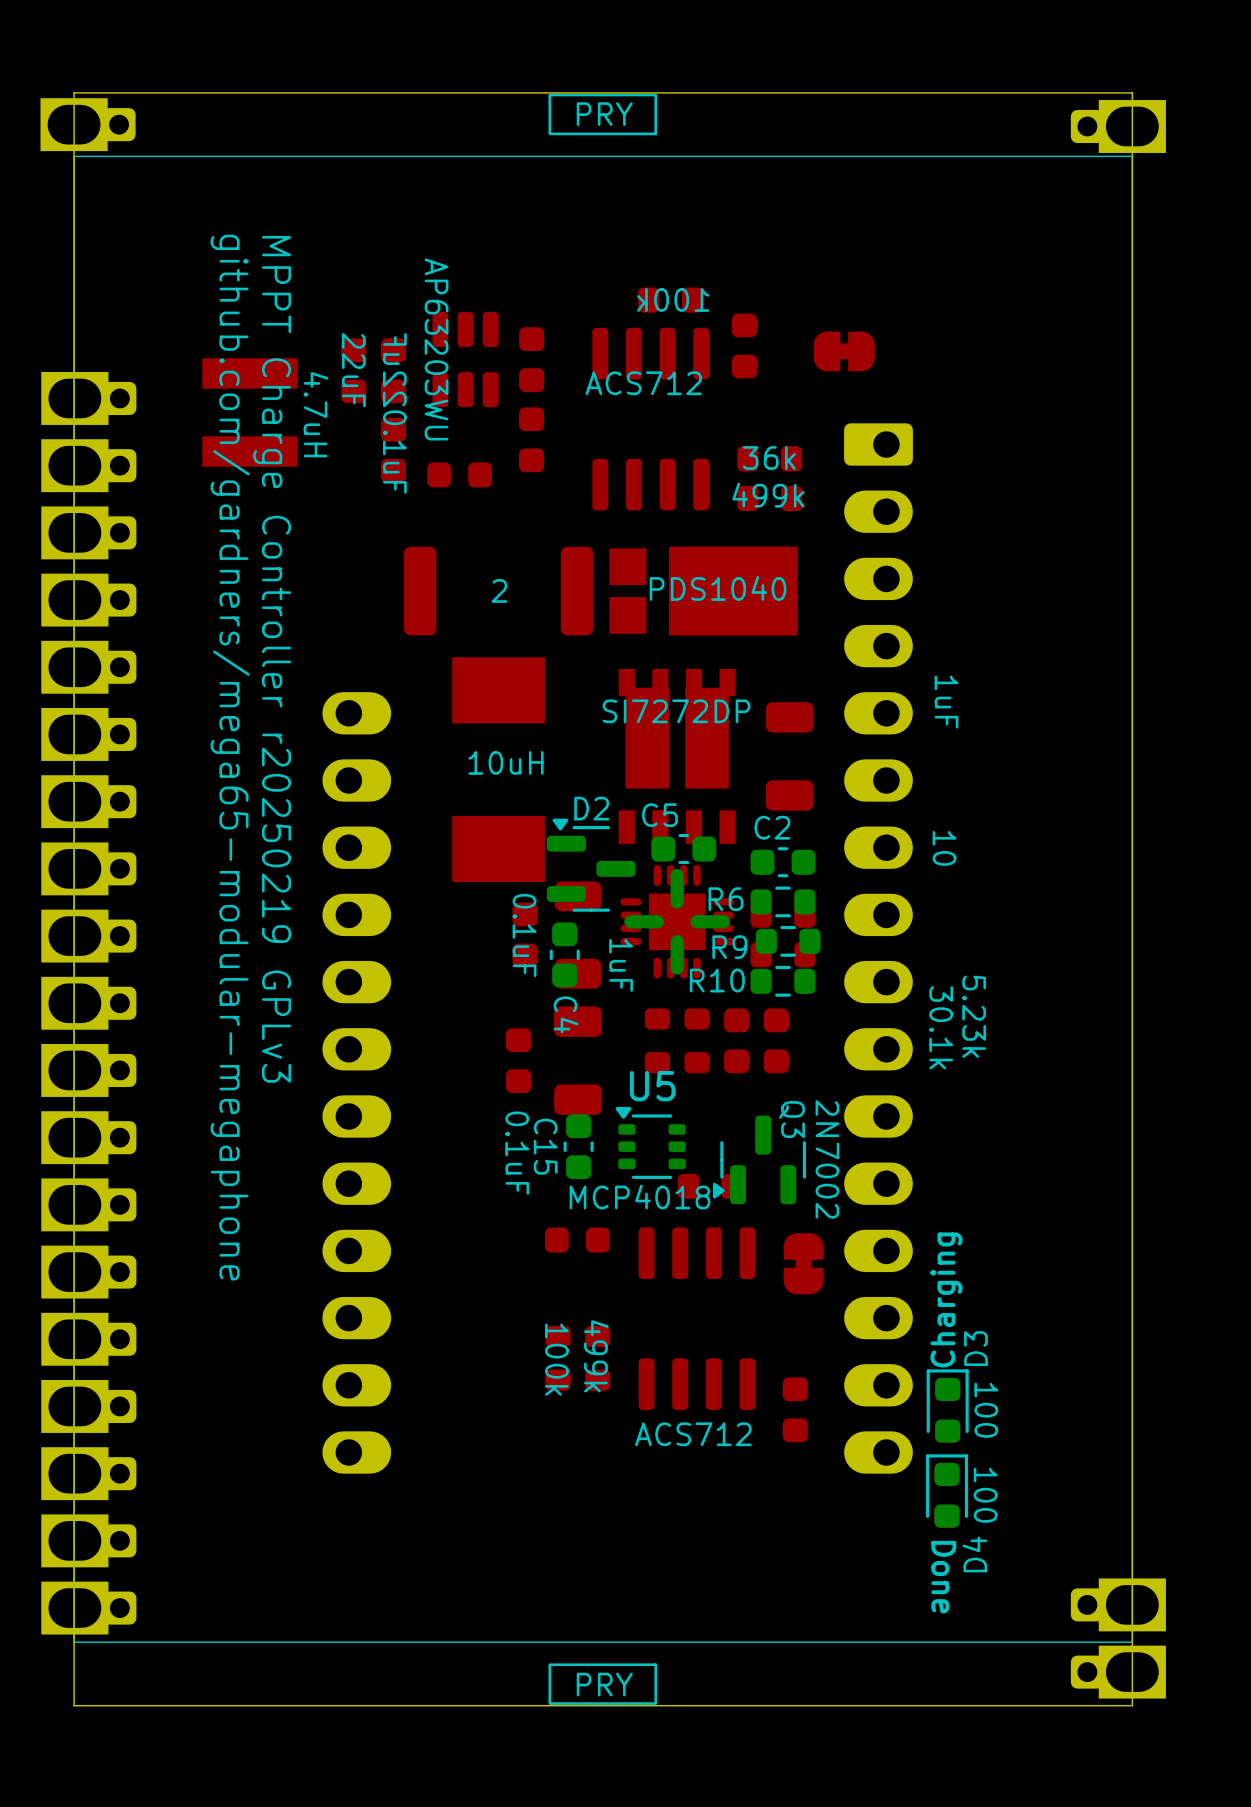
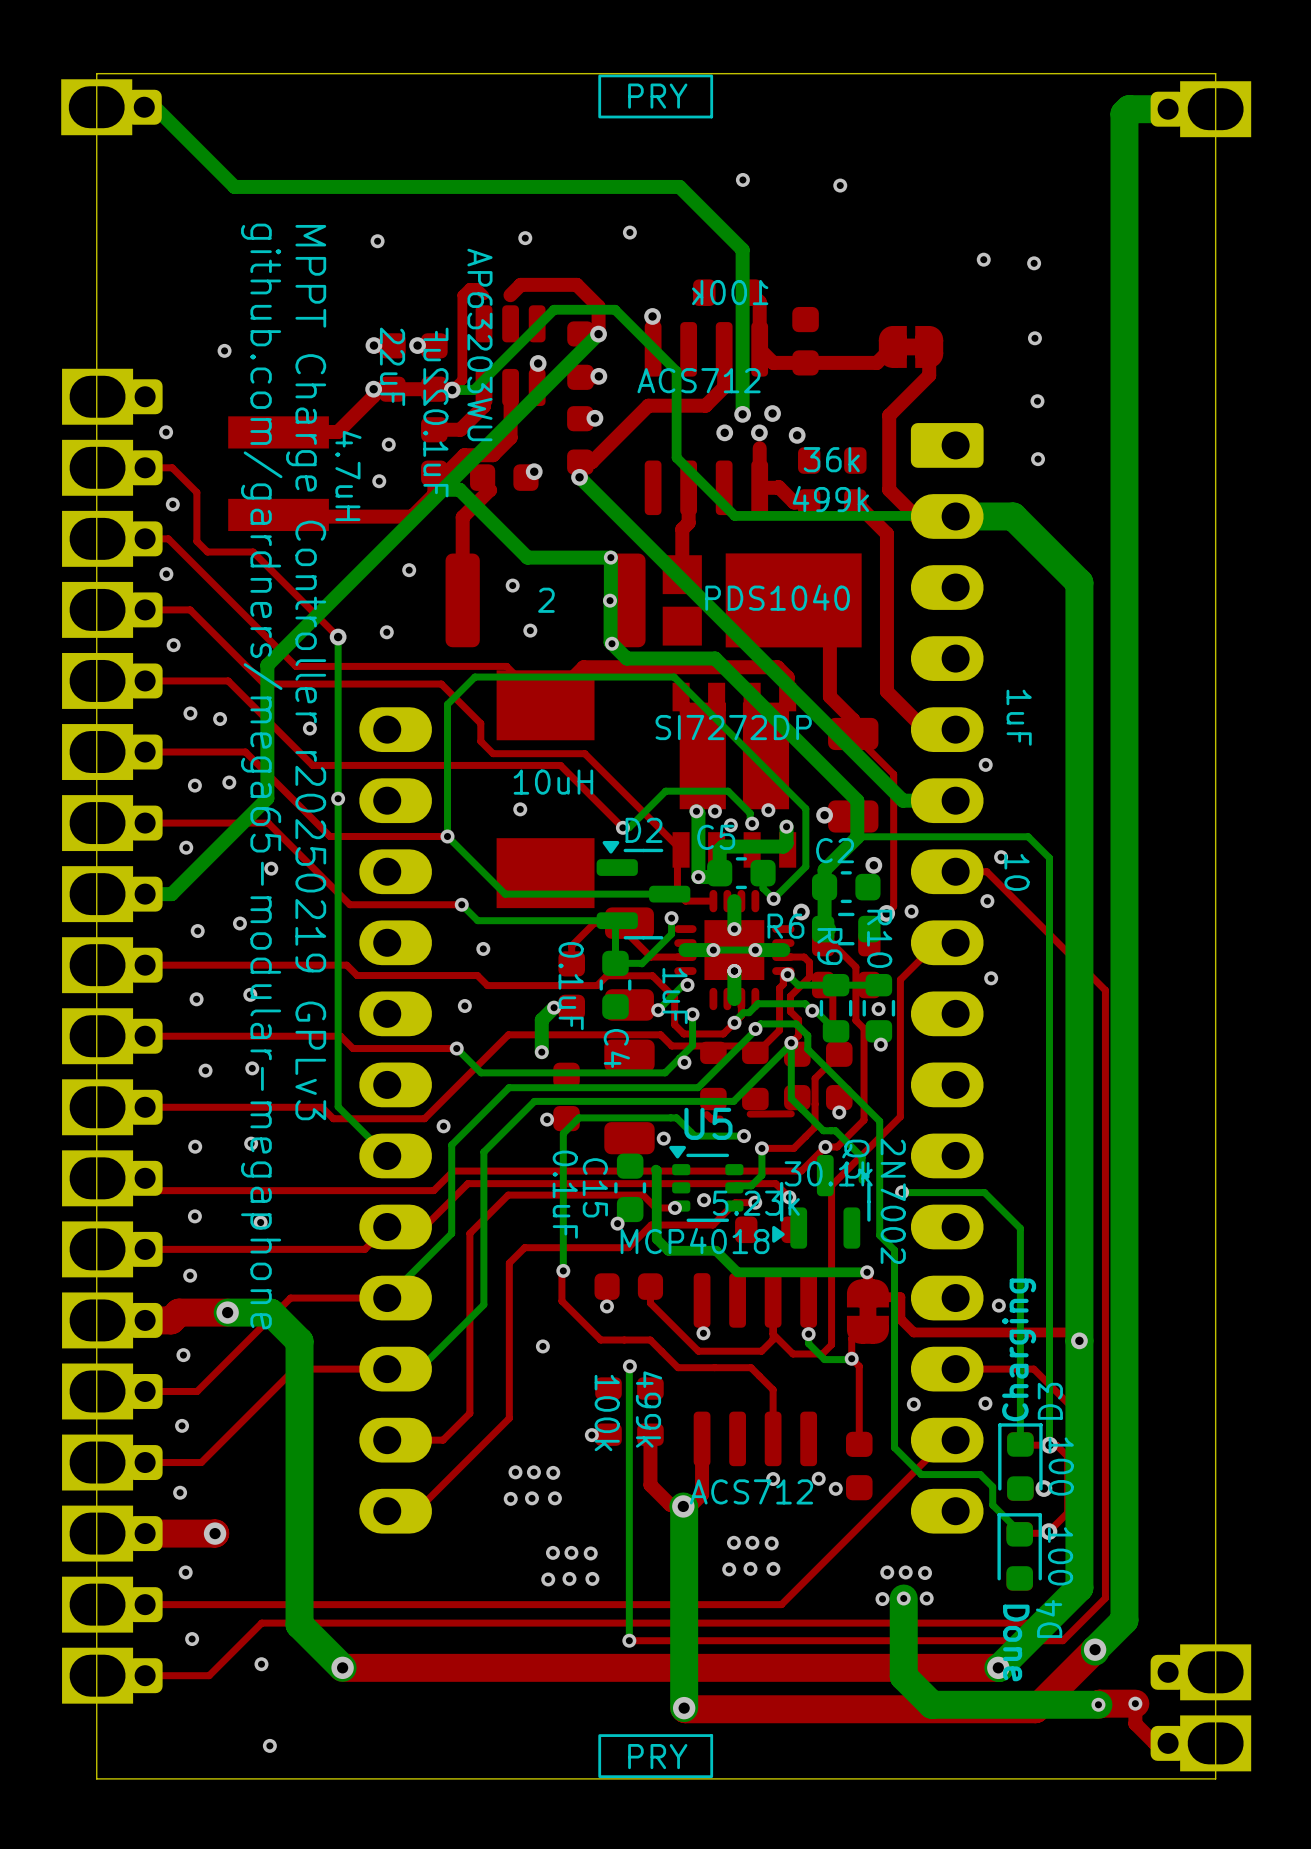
part footprint: [40, 92, 1166, 1707] -> [61, 72, 1252, 1780]
bottom track: none -> (144, 107) (154, 107) (234, 186) (679, 186) (742, 249) (742, 414)
bottom track: none -> (1168, 109) (1129, 109) (1124, 113) (1124, 1620) (1095, 1651)
via: none -> (742, 179)
via: none -> (840, 185)
via: none -> (629, 232)
via: none -> (525, 238)
via: none -> (377, 241)
via: none -> (983, 259)
via: none -> (1034, 263)
top track: none -> (750, 292) (759, 301) (759, 349) (773, 362) (876, 362) (892, 346)
top track: none -> (484, 295) (476, 287) (469, 287) (462, 295) (462, 379) (452, 390) (373, 389) (373, 396) (337, 432) (278, 432)
top track: none -> (510, 295) (520, 284) (576, 284) (598, 306) (598, 334)
via: none -> (652, 316)
bottom track: none -> (598, 334) (267, 665) (267, 798) (171, 894) (145, 894)
via: none -> (598, 334)
via: none -> (1034, 338)
via: none -> (373, 345)
via: none -> (417, 345)
top track: none -> (929, 346) (929, 375) (889, 415) (889, 489) (915, 516) (955, 516)
top track: none -> (724, 349) (724, 387) (705, 405) (648, 405) (591, 462) (580, 462) (579, 477)
via: none -> (224, 350)
via: none -> (538, 363)
via: none -> (598, 376)
top track: none -> (484, 387) (484, 406) (460, 429) (434, 429)
top track: none -> (510, 387) (510, 437) (493, 455) (464, 455) (446, 473) (434, 473) (434, 494) (412, 516) (280, 516) (278, 514)
via: none -> (373, 389)
bottom track: none -> (452, 390) (473, 390) (554, 309) (615, 309) (676, 371) (676, 457) (734, 515) (1013, 516) (1079, 582) (1079, 1587) (998, 1667)
via: none -> (452, 390)
via: none -> (1037, 401)
part position: (249, 412) -> (278, 473)
via: none -> (772, 413)
via: none -> (742, 414)
via: none -> (594, 418)
via: none -> (166, 432)
via: none -> (724, 432)
via: none -> (759, 432)
via: none -> (797, 435)
via: none -> (388, 444)
top track: none -> (759, 448) (759, 487) (778, 487) (794, 502) (809, 502)
via: none -> (1038, 459)
top track: none -> (145, 467) (172, 467) (196, 492) (196, 541) (207, 552) (253, 552) (338, 637)
via: none -> (534, 471)
bottom track: none -> (579, 477) (902, 800) (955, 800)
via: none -> (579, 477)
via: none -> (379, 481)
top track: none -> (688, 487) (688, 522) (682, 529) (682, 574)
bottom track: none -> (442, 489) (459, 489) (527, 557) (610, 557) (610, 600)
top track: none -> (489, 490) (462, 517) (462, 600)
top track: none -> (855, 502) (886, 533) (886, 691) (925, 729) (955, 729)
via: none -> (172, 504)
top track: none -> (145, 538) (168, 538) (295, 666) (506, 666) (545, 705) (583, 667) (777, 667) (787, 677) (787, 697)
via: none -> (610, 557)
via: none -> (409, 570)
via: none -> (166, 574)
via: none -> (512, 585)
bottom track: none -> (610, 600) (610, 642) (626, 658) (715, 658) (857, 800) (857, 837) (824, 870) (824, 880) (830, 886) (824, 891) (824, 927) (829, 929)
via: none -> (610, 600)
top track: none -> (145, 609) (190, 609) (264, 684) (441, 684) (480, 723) (480, 741) (493, 753) (584, 753) (681, 849) (677, 853) (677, 893) (685, 901) (713, 901)
via: none -> (530, 630)
via: none -> (386, 632)
bottom track: none -> (338, 637) (338, 1106) (387, 1155)
via: none -> (338, 637)
top track: none -> (752, 641) (793, 600) (829, 636) (829, 696) (853, 719) (853, 733) (893, 774) (893, 906) (886, 913)
via: none -> (611, 643)
via: none -> (173, 645)
top track: none -> (145, 680) (228, 680) (312, 765) (560, 765) (622, 827)
via: none -> (190, 713)
via: none -> (220, 719)
via: none -> (309, 728)
top track: none -> (145, 752) (245, 752) (330, 836) (447, 836)
via: none -> (985, 764)
via: none -> (229, 782)
via: none -> (194, 785)
via: none -> (338, 798)
via: none -> (520, 809)
via: none -> (768, 810)
bottom track: none -> (696, 811) (698, 813) (698, 877) (715, 877) (719, 873) (719, 849) (723, 846) (783, 846) (786, 843) (786, 826)
via: none -> (696, 811)
via: none -> (714, 811)
via: none -> (824, 815)
top track: none -> (145, 823) (268, 823) (349, 904) (461, 904)
bottom track: none -> (752, 823) (750, 821) (750, 813) (728, 791) (665, 791) (629, 827) (622, 827)
via: none -> (752, 823)
via: none -> (730, 825)
via: none -> (786, 826)
via: none -> (622, 827)
via: none -> (447, 836)
bottom track: none -> (857, 836) (1028, 836) (1049, 858) (1049, 1445)
via: none -> (186, 847)
via: none -> (1001, 857)
via: none -> (873, 865)
via: none -> (271, 868)
top track: none -> (955, 871) (986, 871) (1105, 990) (1105, 1598) (1062, 1640) (629, 1640)
bottom track: none -> (763, 873) (763, 888) (773, 898) (805, 866) (805, 808) (674, 677) (474, 677) (447, 704) (447, 836) (505, 894) (669, 894)
via: none -> (698, 877)
via: none -> (773, 898)
via: none -> (987, 901)
bottom track: none -> (461, 904) (477, 920) (617, 920) (615, 922) (615, 963) (641, 963) (671, 934) (671, 918)
via: none -> (461, 904)
via: none -> (801, 912)
via: none -> (911, 911)
via: none -> (886, 913)
via: none -> (671, 918)
via: none -> (239, 923)
via: none -> (734, 929)
via: none -> (197, 931)
top track: none -> (832, 942) (855, 967) (855, 1020) (864, 1028) (864, 1120) (837, 1146) (825, 1146) (801, 1171) (453, 1171) (433, 1190) (157, 1190) (145, 1178)
top track: none -> (955, 942) (937, 942) (900, 979) (900, 1116) (831, 1185) (831, 1344) (822, 1353) (792, 1353) (773, 1334)
via: none -> (483, 948)
via: none -> (713, 950)
bottom track: none -> (755, 950) (713, 950)
via: none -> (755, 950)
top track: none -> (685, 957) (650, 957) (629, 935) (629, 923) (594, 923) (571, 945) (571, 963)
top track: none -> (783, 957) (804, 957) (809, 962) (809, 977) (790, 996) (790, 1011) (798, 1019) (798, 1035) (791, 1042)
part position: (525, 935) -> (571, 985)
top track: none -> (145, 965) (346, 965) (357, 975) (477, 975) (487, 985) (597, 985) (606, 975) (652, 975) (674, 997) (674, 1024) (683, 1033) (723, 1033) (741, 1015) (741, 999)
via: none -> (734, 971)
R9 rotation: 0° (788, 941) -> 90° clockwise (836, 1008)
top track: none -> (787, 974) (783, 971) (783, 984) (779, 988) (779, 1030) (763, 1046) (671, 1046) (660, 1034) (508, 1034) (424, 1118) (333, 1118) (321, 1107) (145, 1107)
bottom track: none -> (787, 974) (798, 985) (878, 985)
via: none -> (787, 974)
via: none -> (991, 978)
bottom track: none -> (687, 985) (683, 985) (658, 1010)
via: none -> (687, 985)
top track: none -> (832, 985) (832, 1047) (839, 1054) (815, 1078) (815, 1127) (793, 1148) (761, 1148)
via: none -> (250, 994)
via: none -> (196, 999)
via: none -> (464, 1006)
bottom track: none -> (554, 1007) (541, 1019) (541, 1052)
via: none -> (554, 1007)
via: none -> (878, 1009)
via: none -> (658, 1010)
via: none -> (812, 1010)
R10 rotation: 0° (782, 981) -> 90° clockwise (878, 1008)
bottom track: none -> (692, 1014) (692, 1045) (665, 1072) (481, 1072) (456, 1048)
via: none -> (692, 1014)
bottom track: none -> (734, 1022) (743, 1012) (749, 1012) (758, 1003) (805, 1003) (812, 1010) (815, 1010) (836, 1031)
via: none -> (734, 1022)
via: none -> (755, 1028)
top track: none -> (145, 1036) (340, 1036) (352, 1048) (456, 1048)
via: none -> (791, 1042)
via: none -> (880, 1044)
via: none -> (456, 1048)
via: none -> (541, 1052)
via: none -> (684, 1062)
via: none -> (252, 1068)
via: none -> (205, 1070)
via: none -> (839, 1112)
top track: none -> (791, 1113) (750, 1114)
top track: none -> (706, 1114) (711, 1119) (720, 1119)
via: none -> (547, 1119)
via: none -> (443, 1126)
bottom track: none -> (744, 1136) (694, 1136) (676, 1117) (578, 1117) (563, 1133) (563, 1270)
via: none -> (744, 1136)
via: none -> (663, 1138)
via: none -> (251, 1143)
via: none -> (195, 1146)
via: none -> (825, 1146)
bottom track: none -> (761, 1148) (761, 1175) (751, 1185) (736, 1185) (734, 1187)
via: none -> (761, 1148)
bottom track: none -> (655, 1169) (656, 1239) (668, 1250) (716, 1250) (737, 1272) (867, 1272)
bottom track: none -> (862, 1180) (862, 1157) (835, 1130) (823, 1130) (791, 1098) (791, 1042) (794, 1046) (789, 1046) (733, 1101) (534, 1101) (483, 1152) (483, 1304) (419, 1369) (387, 1369)
via: none -> (902, 1192)
bottom track: none -> (902, 1192) (984, 1192) (1020, 1228) (1020, 1444)
top track: none -> (789, 1197) (775, 1183) (467, 1183) (422, 1229) (389, 1229) (387, 1227) (364, 1249) (145, 1249)
via: none -> (789, 1197)
via: none -> (704, 1200)
top track: none -> (755, 1202) (735, 1202) (712, 1225) (651, 1225) (628, 1247) (524, 1247) (509, 1263) (509, 1418) (416, 1511) (387, 1511)
via: none -> (755, 1202)
top track: none -> (674, 1207) (655, 1207) (643, 1195) (508, 1195) (469, 1233) (469, 1413) (443, 1440) (387, 1440)
via: none -> (674, 1207)
via: none -> (194, 1216)
via: none -> (260, 1222)
via: none -> (617, 1223)
top track: none -> (563, 1270) (561, 1301) (600, 1340) (650, 1340) (678, 1367) (751, 1367) (773, 1389) (773, 1438)
via: none -> (563, 1270)
top track: none -> (867, 1272) (867, 1293) (871, 1297) (900, 1297) (900, 1319) (913, 1332) (1071, 1332) (1079, 1340)
via: none -> (867, 1272)
via: none -> (190, 1275)
top track: none -> (650, 1286) (650, 1303) (698, 1351) (761, 1351) (773, 1339) (773, 1300)
top track: none -> (387, 1298) (290, 1298) (197, 1391) (145, 1391)
bottom track: none -> (419, 1298) (387, 1298) (451, 1233) (451, 1145) (509, 1087) (698, 1087) (760, 1023) (796, 1023) (807, 1035) (807, 1049) (879, 1121) (879, 1235) (894, 1250) (894, 1447) (921, 1474) (980, 1474) (992, 1486) (992, 1505) (1019, 1532) (1019, 1534)
via: none -> (606, 1306)
via: none -> (998, 1305)
top track: none -> (227, 1312) (178, 1312) (171, 1320) (145, 1320)
bottom track: none -> (227, 1312) (270, 1312) (299, 1341) (299, 1624) (342, 1667)
via: none -> (227, 1312)
top track: none -> (867, 1329) (860, 1329) (851, 1338) (851, 1358) (859, 1366) (859, 1444)
via: none -> (703, 1333)
bottom track: none -> (808, 1334) (808, 1343) (824, 1359) (851, 1358)
via: none -> (808, 1334)
via: none -> (1079, 1340)
via: none -> (542, 1346)
via: none -> (183, 1355)
via: none -> (851, 1358)
bottom track: none -> (629, 1366) (629, 1640)
via: none -> (629, 1366)
top track: none -> (387, 1369) (294, 1369) (201, 1462) (145, 1462)
top track: none -> (955, 1369) (1033, 1369) (1086, 1421) (1086, 1589) (1053, 1623) (261, 1623) (209, 1675) (145, 1675)
via: none -> (985, 1403)
via: none -> (913, 1404)
via: none -> (182, 1425)
via: none -> (591, 1435)
top track: none -> (650, 1434) (650, 1485) (670, 1504) (691, 1504) (702, 1494) (702, 1438)
top track: none -> (955, 1440) (945, 1440) (781, 1604) (145, 1604)
top track: none -> (1020, 1443) (1022, 1445) (1056, 1445) (1067, 1456) (1067, 1512) (1047, 1533) (1019, 1533)
via: none -> (1049, 1445)
via: none -> (515, 1472)
via: none -> (533, 1472)
via: none -> (553, 1472)
via: none -> (818, 1478)
via: none -> (773, 1479)
via: none -> (835, 1488)
via: none -> (1043, 1488)
via: none -> (180, 1492)
via: none -> (510, 1498)
via: none -> (531, 1498)
via: none -> (554, 1498)
bottom track: none -> (683, 1506) (684, 1708)
via: none -> (683, 1506)
via: none -> (1048, 1531)
top track: none -> (215, 1533) (145, 1533)
via: none -> (215, 1533)
via: none -> (733, 1542)
via: none -> (752, 1542)
via: none -> (771, 1543)
via: none -> (552, 1552)
via: none -> (571, 1552)
via: none -> (590, 1553)
via: none -> (729, 1569)
via: none -> (750, 1568)
via: none -> (773, 1568)
via: none -> (185, 1572)
via: none -> (887, 1572)
via: none -> (905, 1572)
via: none -> (925, 1573)
via: none -> (569, 1578)
via: none -> (592, 1578)
via: none -> (548, 1579)
via: none -> (882, 1599)
bottom track: none -> (903, 1598) (903, 1676) (932, 1704) (1098, 1704)
via: none -> (903, 1598)
via: none -> (926, 1598)
via: none -> (192, 1639)
via: none -> (629, 1640)
top track: none -> (1095, 1649) (1035, 1709) (684, 1708)
via: none -> (1095, 1649)
via: none -> (261, 1664)
via: none -> (342, 1667)
top track: none -> (998, 1667) (342, 1667)
via: none -> (998, 1667)
via: none -> (1135, 1703)
top track: none -> (1098, 1704) (1135, 1703) (1135, 1723) (1154, 1743) (1168, 1743)
via: none -> (1098, 1704)
via: none -> (684, 1708)
via: none -> (269, 1745)

